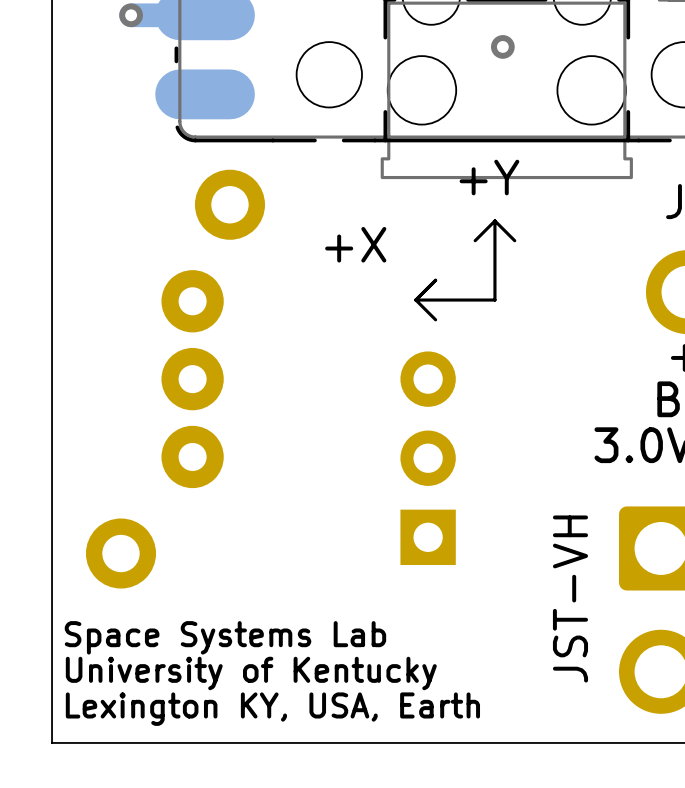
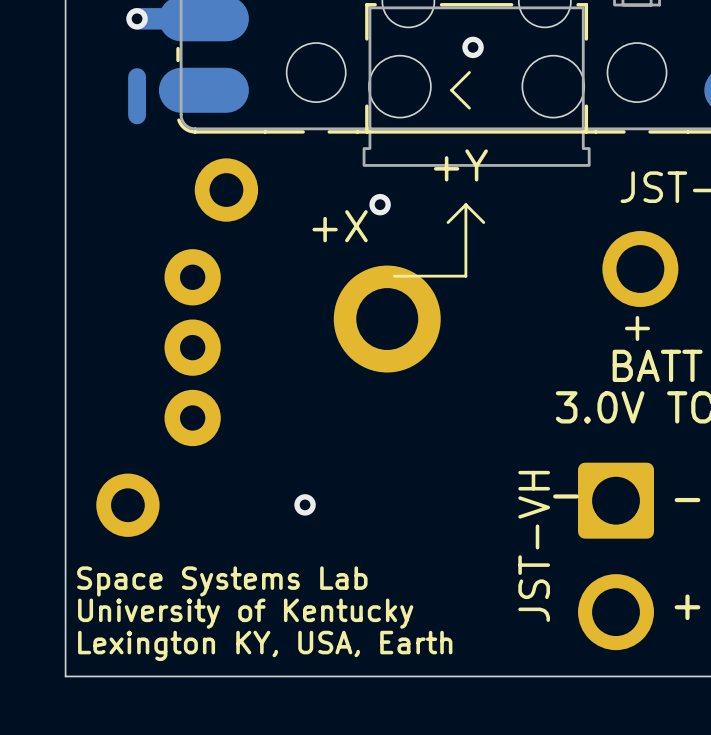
track: none -> (137, 77) (137, 115)
via: none -> (380, 204)
line: (435, 280) (415, 300) (435, 319) -> (469, 72) (451, 90) (469, 108)
part: none -> (387, 319)
part: (428, 458) -> none
text: none -> - (565, 496)
via: none -> (305, 504)

